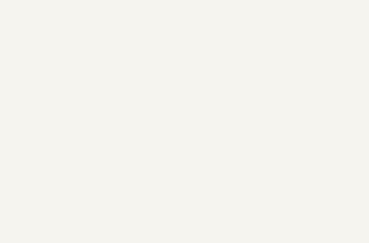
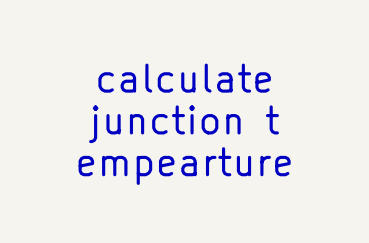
text: none -> calculate (184, 78)
text: none -> junction t (184, 124)
text: none -> empearture (184, 166)

